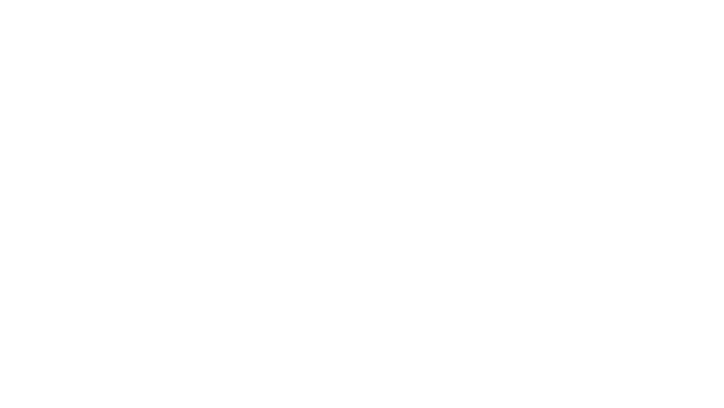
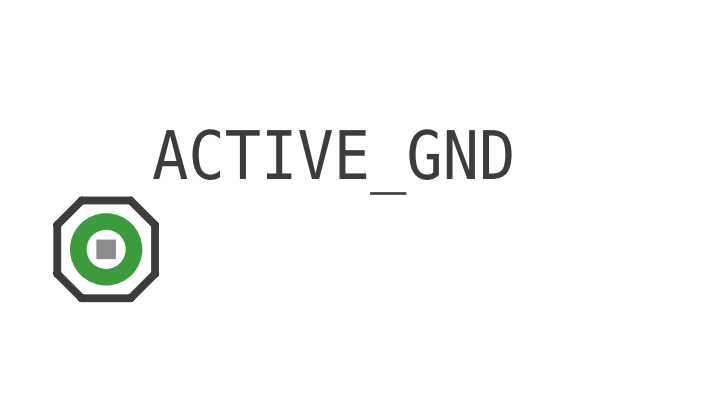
ACTIVE_GND: none -> (106, 249)

